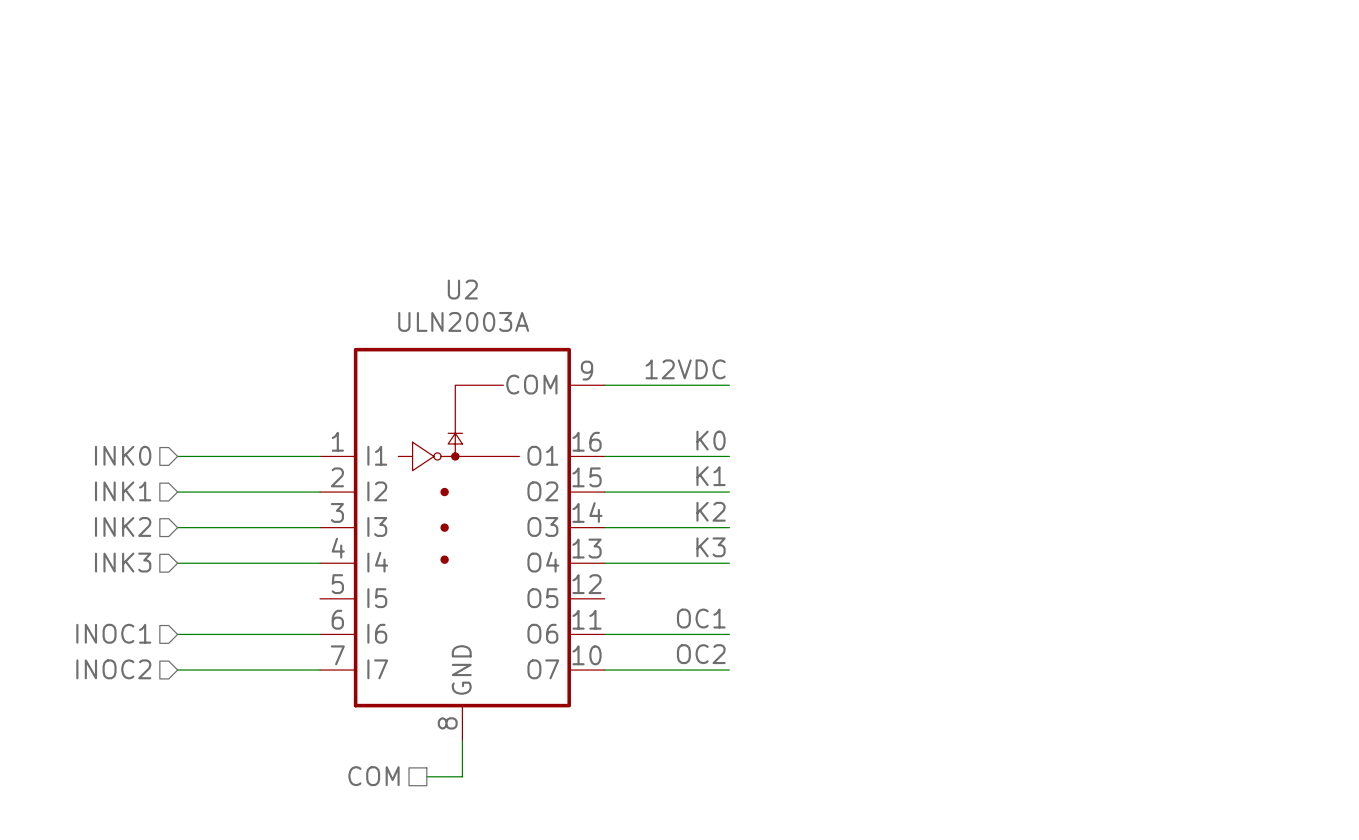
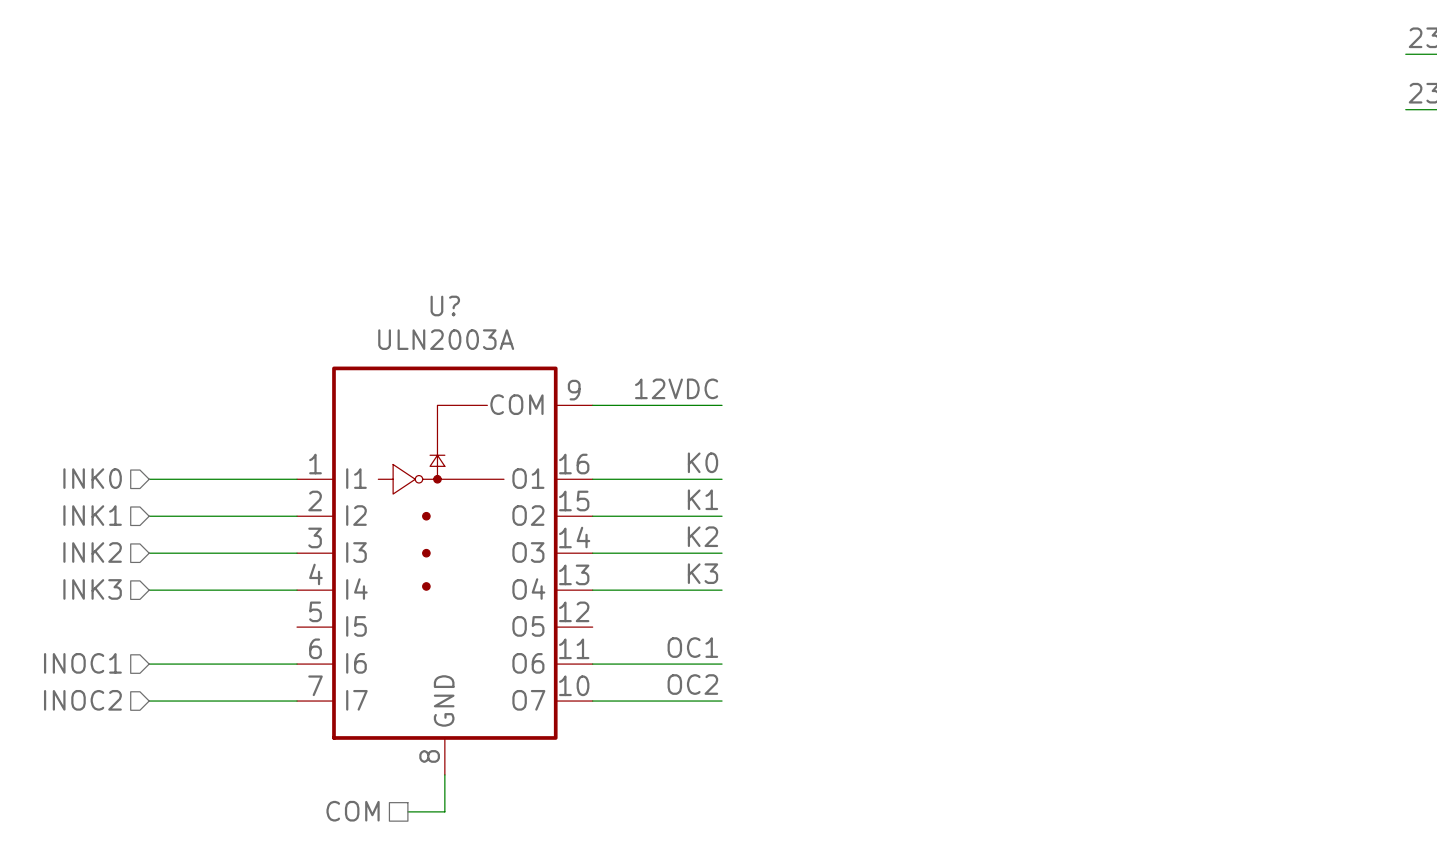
U2 name: U2 (462, 289) -> U? (445, 305)

